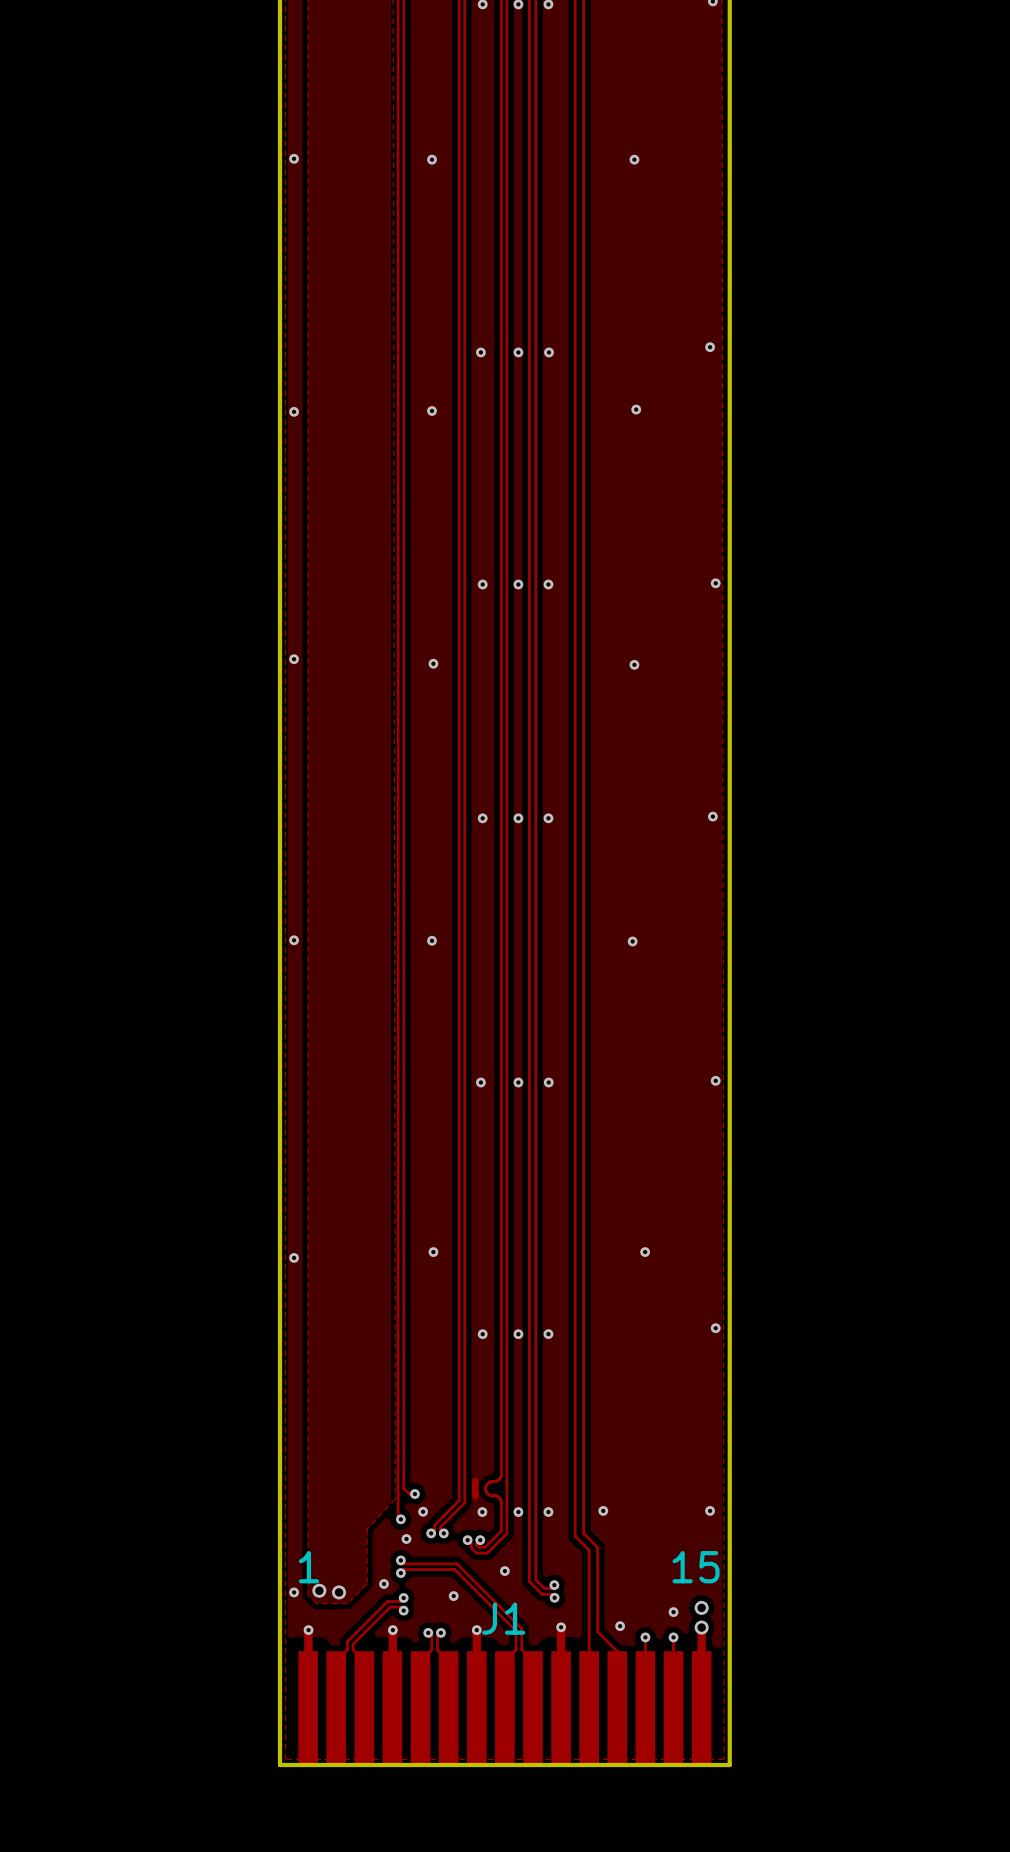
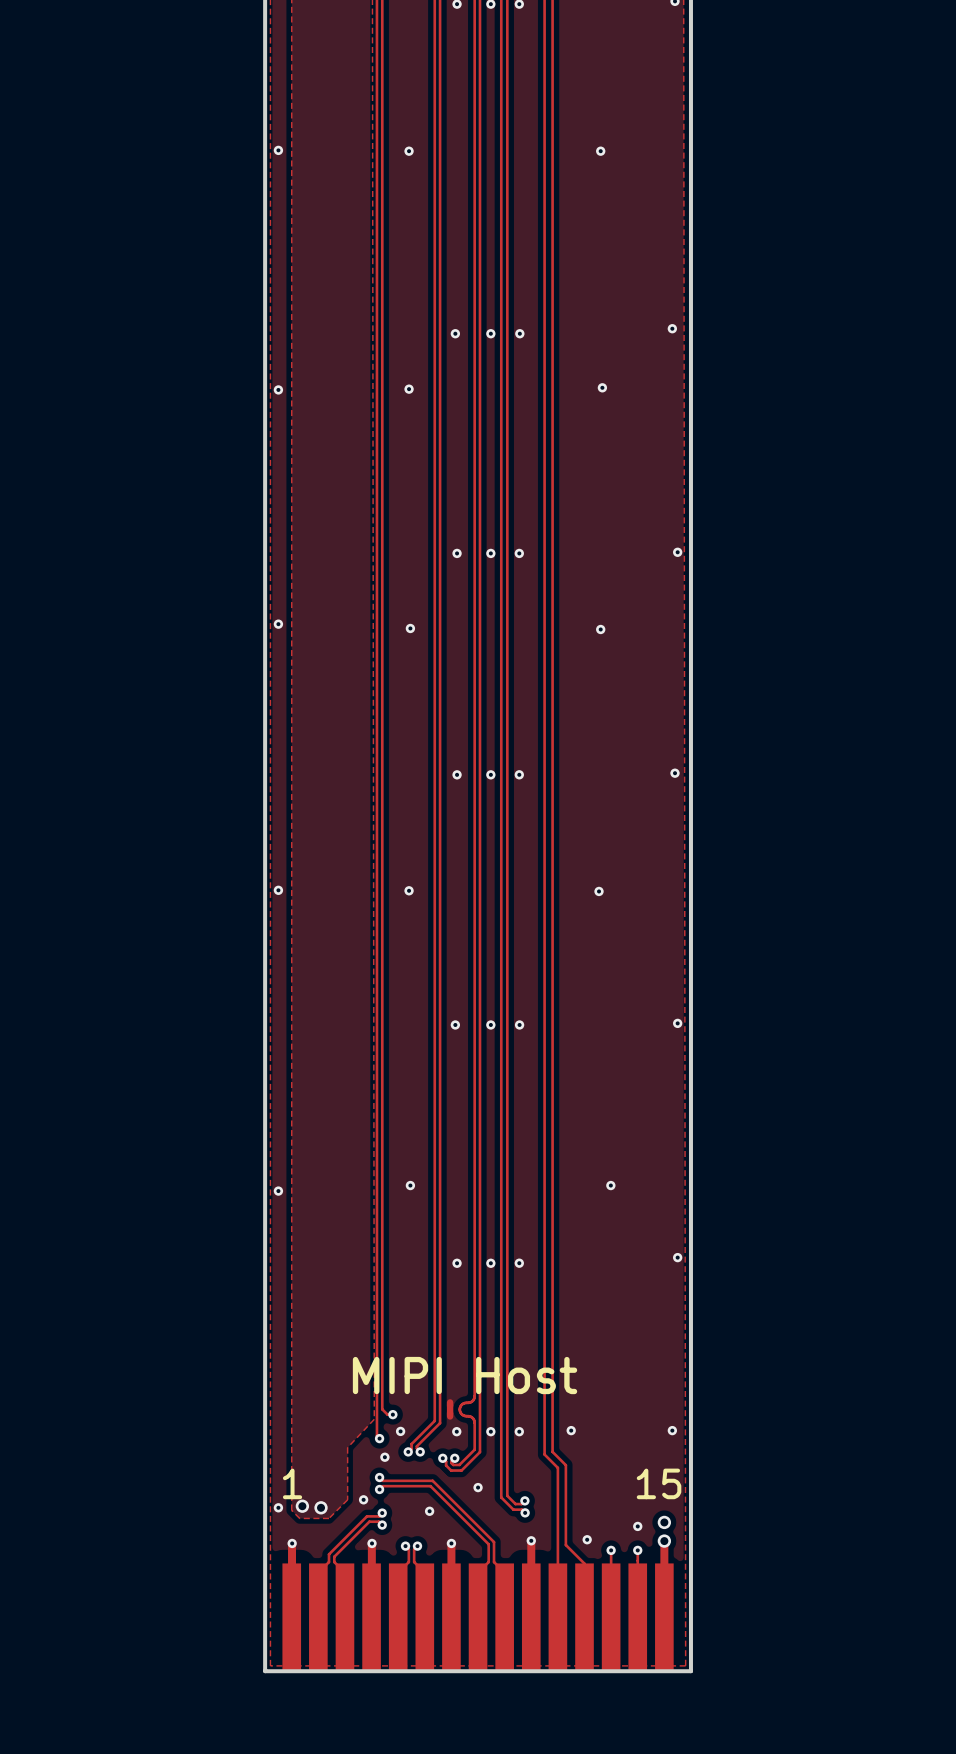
text: none -> MIPI Host (465, 1375)
J1 name: J1 (503, 1618) -> none

